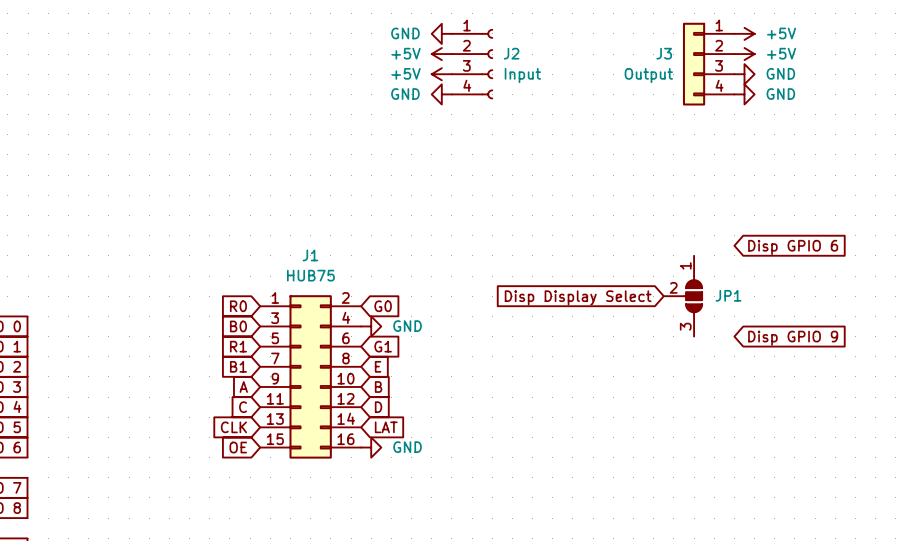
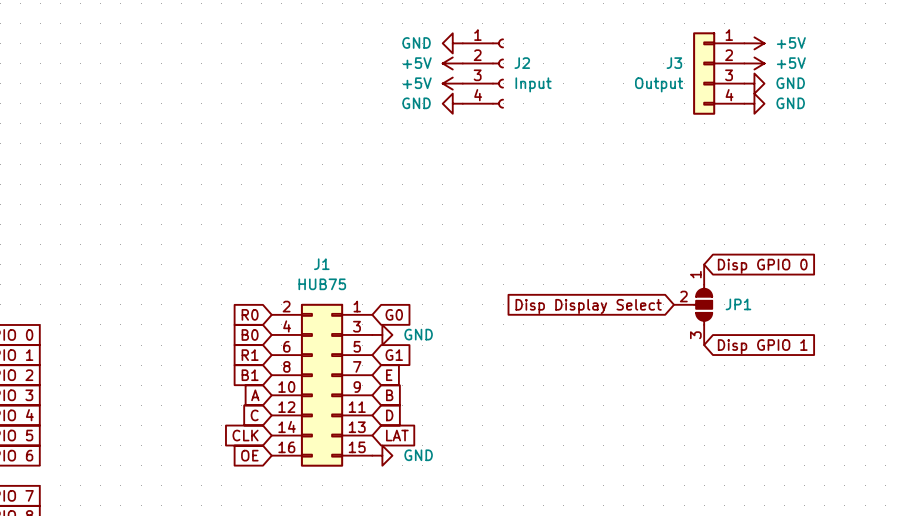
global label: Disp GPIO 6 (793, 247) -> Disp GPIO 0 (762, 266)
global label: Disp GPIO 9 (793, 338) -> Disp GPIO 1 (762, 346)
J1 flip: as is (310, 376) -> left-right (322, 385)

